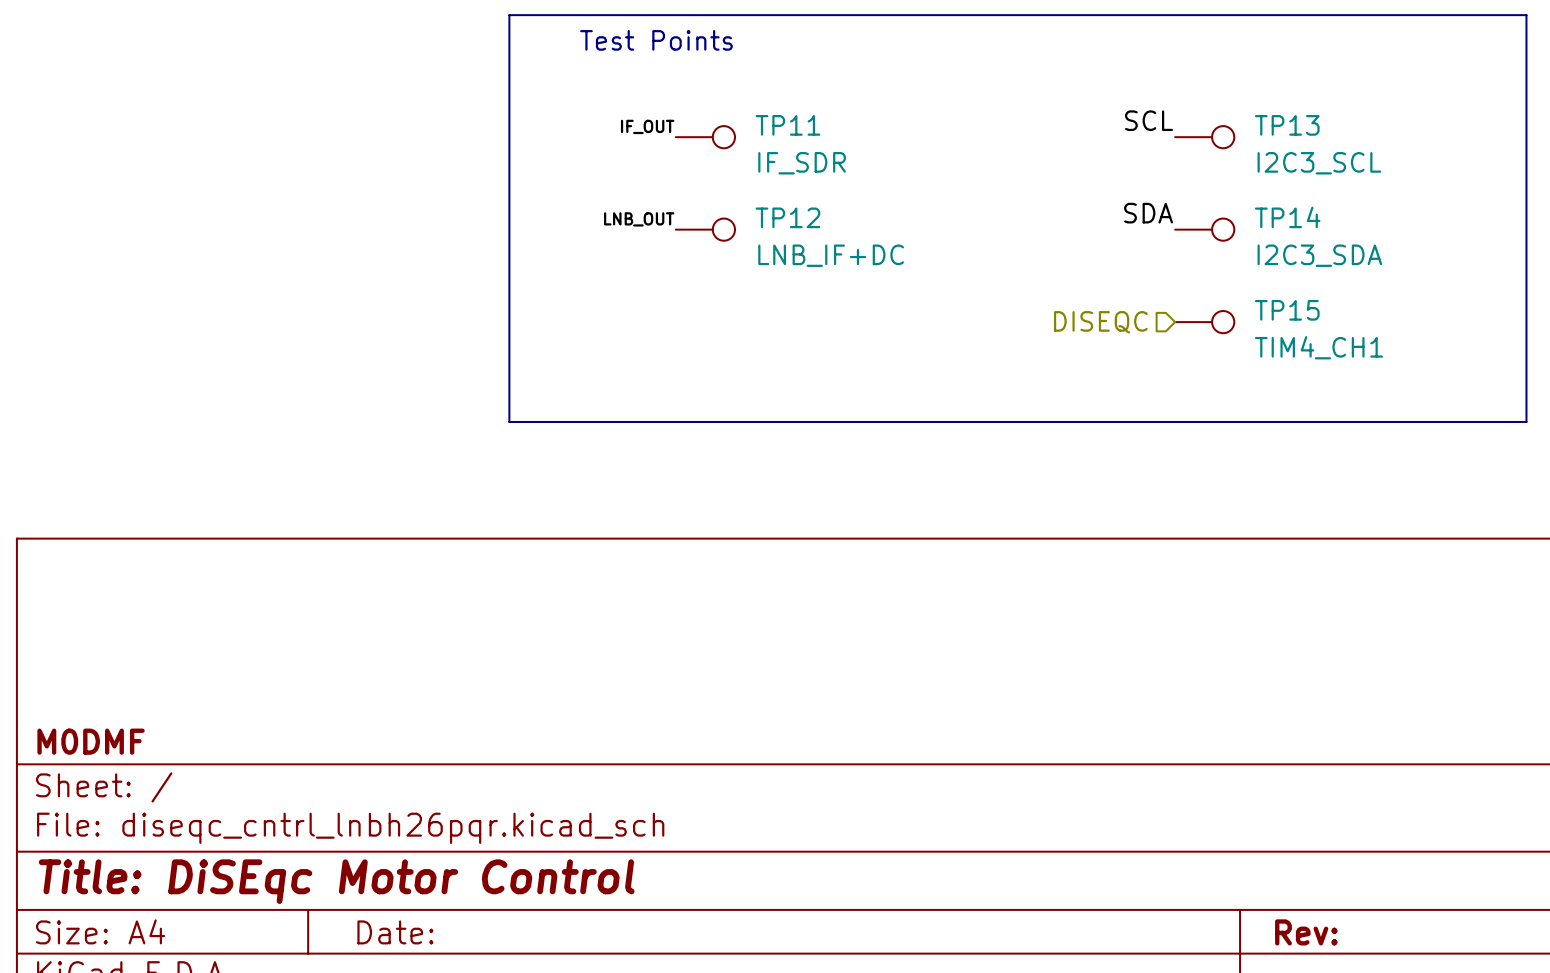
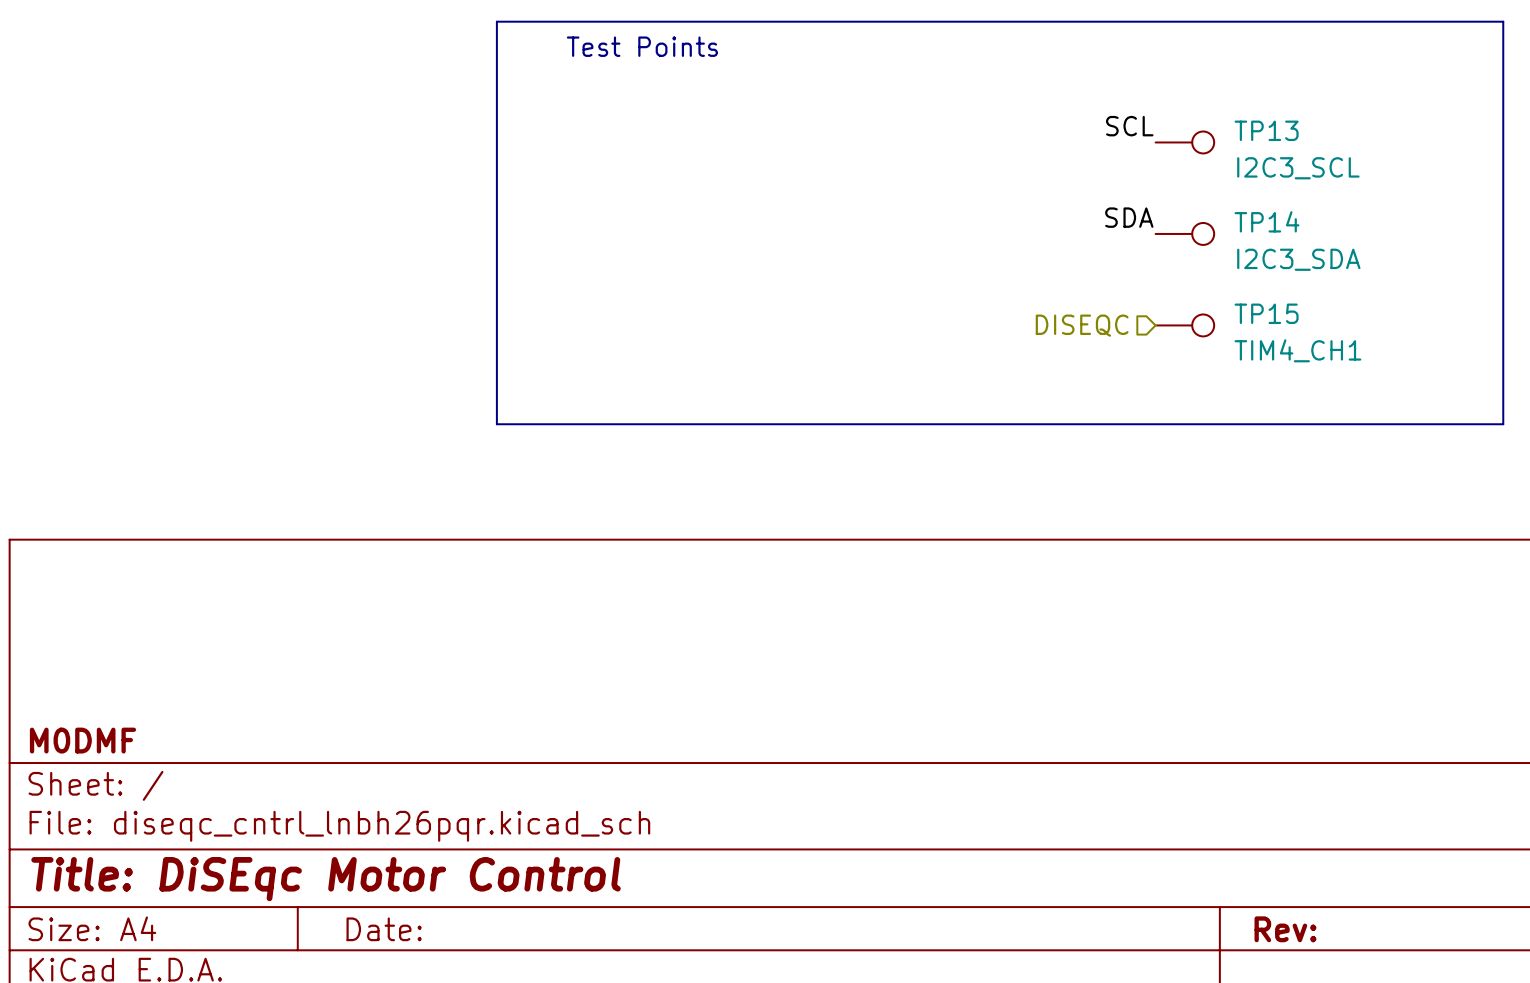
label: IF_OUT (647, 126) -> none
TP11: IF_SDR (705, 137) -> none
label: LNB_OUT (639, 219) -> none
TP12: LNB_IF+DC (705, 229) -> none

